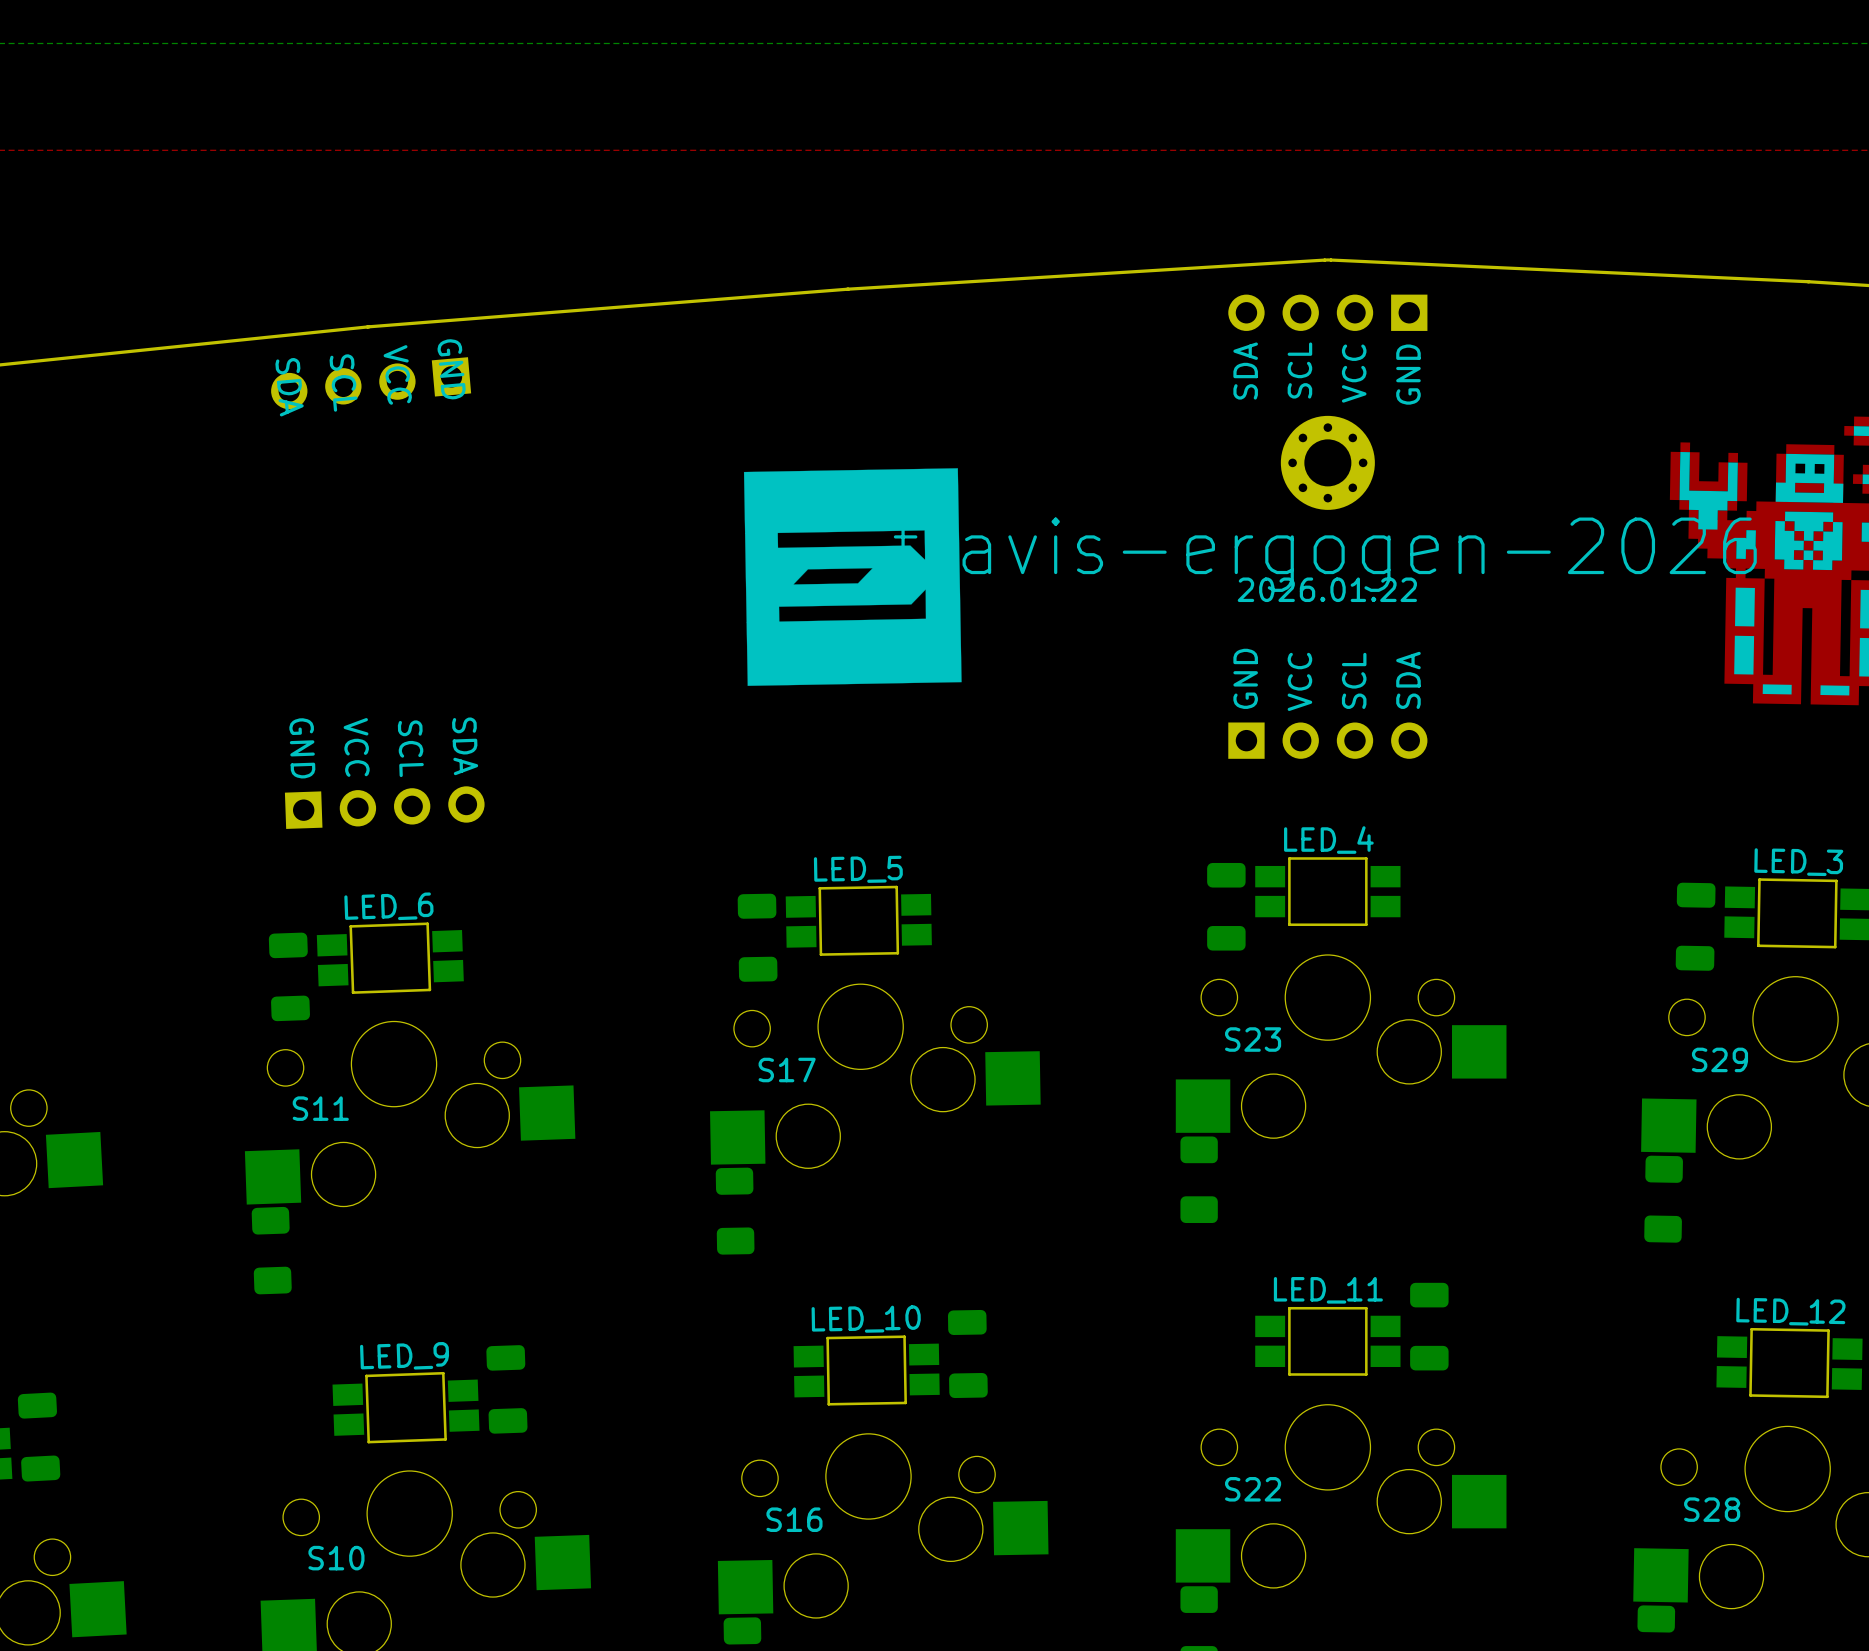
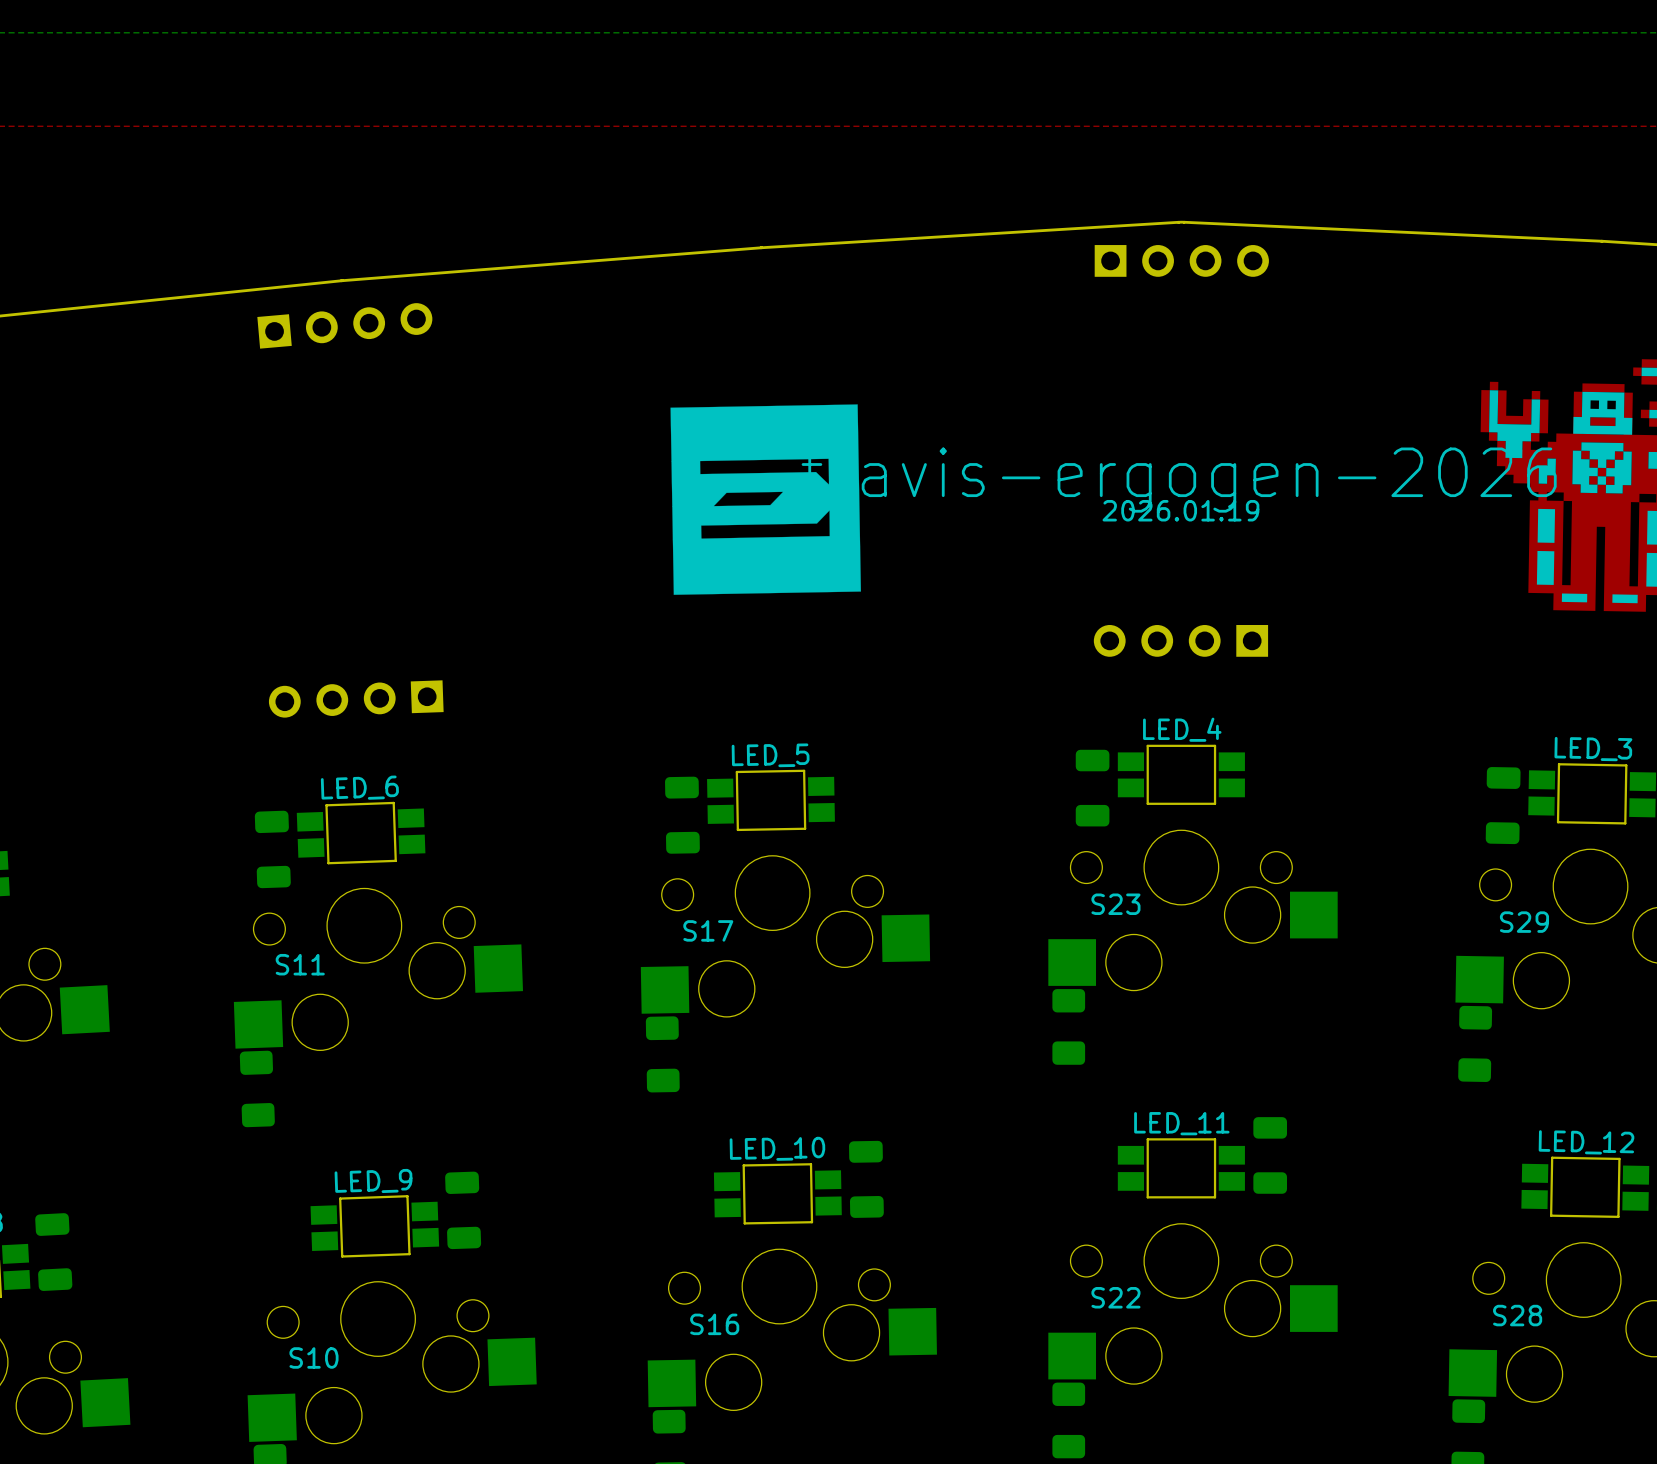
part footprint: [1228, 294, 1428, 331] -> [1094, 245, 1269, 277]
part footprint: [271, 357, 472, 410] -> [257, 303, 433, 349]
part: (1327, 462) -> none
text: 2026.01.22 (1327, 589) -> 2026.01.19 (1180, 510)
part footprint: [1228, 722, 1428, 759] -> [1093, 625, 1269, 657]
part footprint: [284, 786, 485, 829] -> [268, 680, 444, 718]

